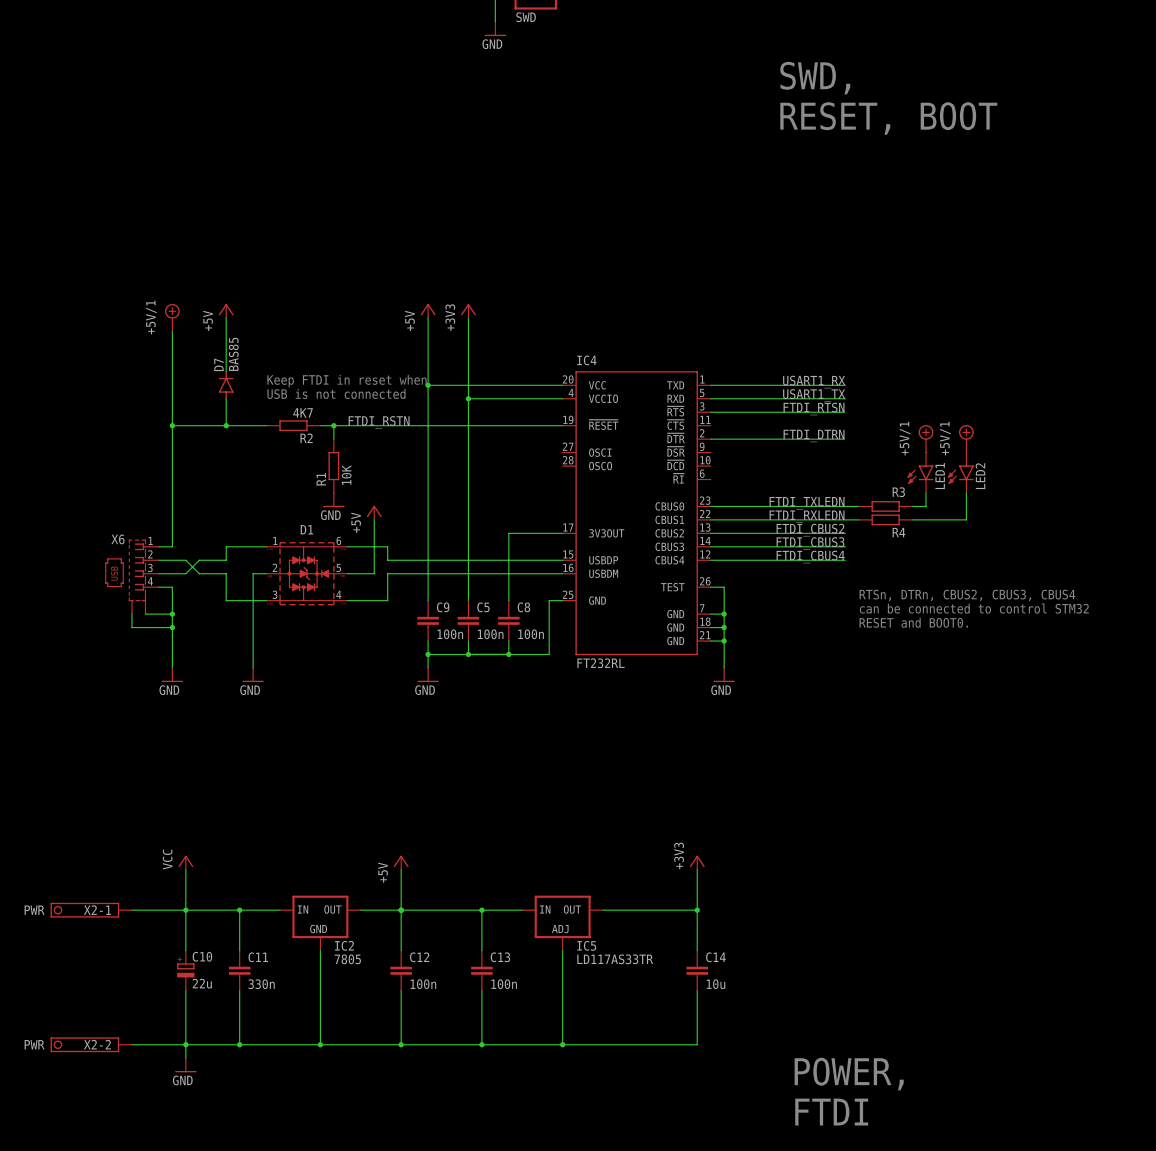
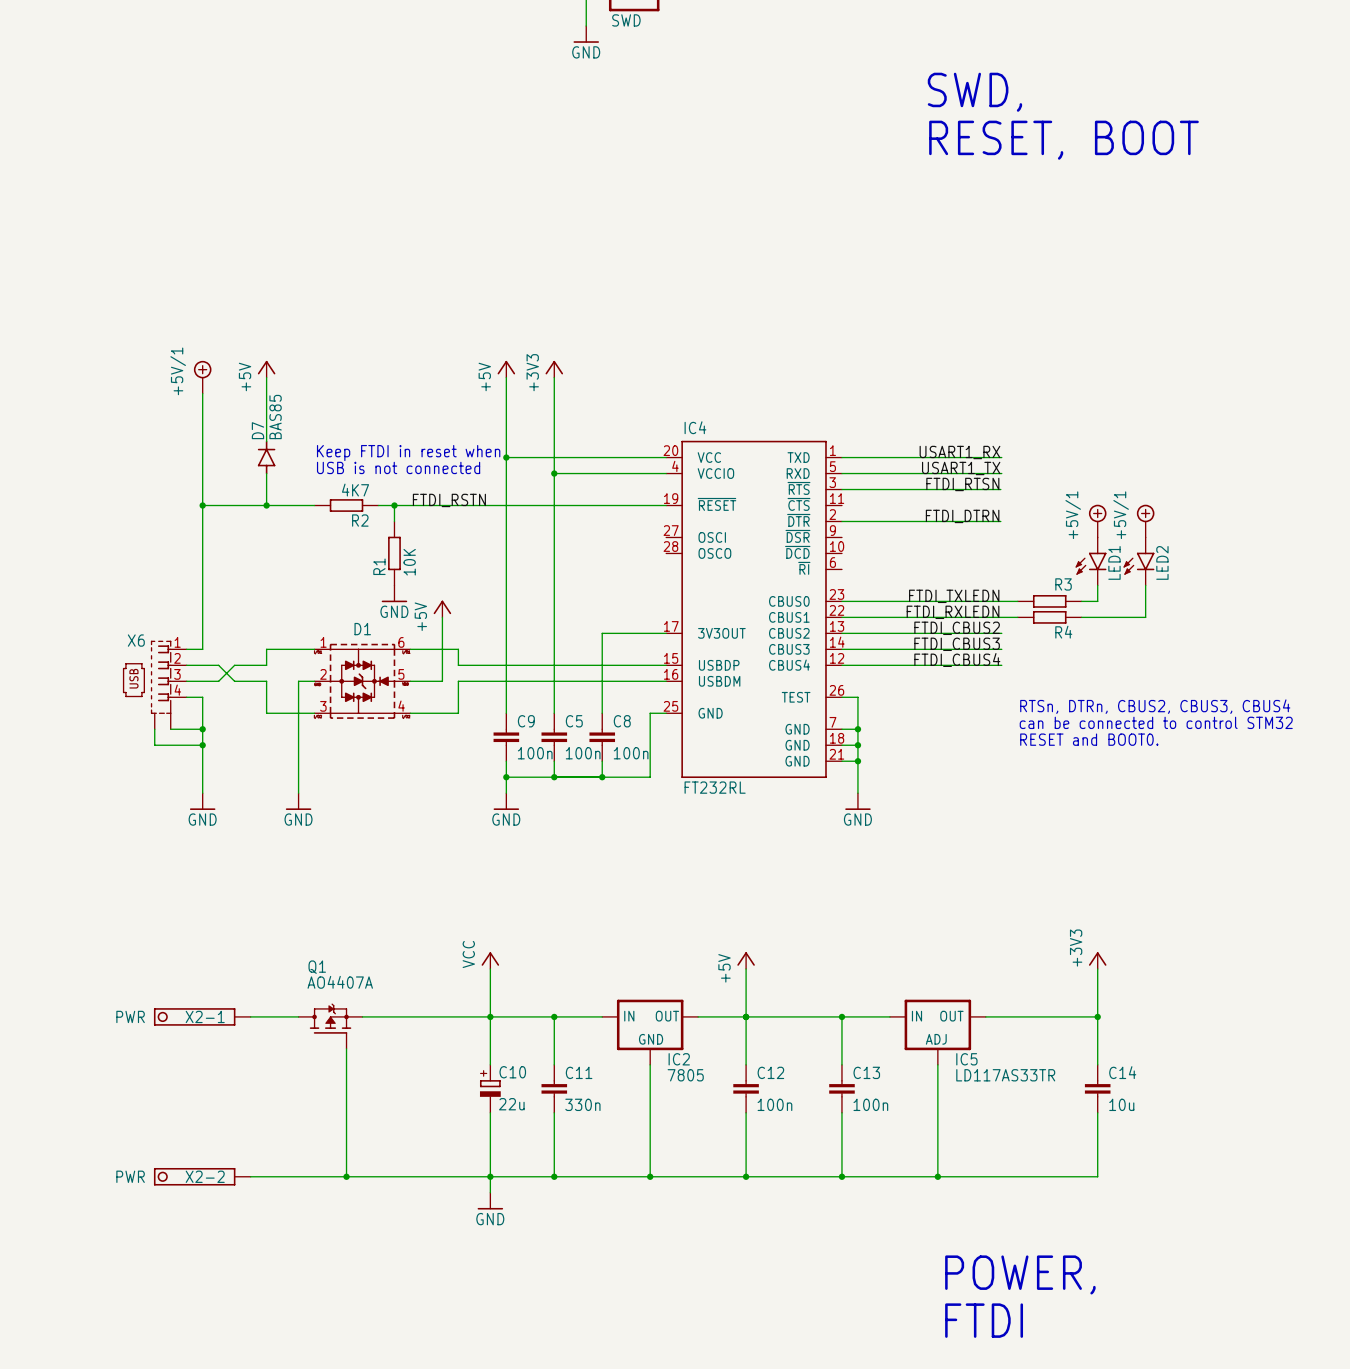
power symbol: none -> VCC (490, 960)
power symbol: none -> +5V (746, 960)
power symbol: none -> +3V3 (1097, 960)
wire: none -> (1097, 969) (1097, 1064)
wire: none -> (250, 1016) (298, 1016)
wire: none -> (362, 1016) (602, 1016)
junction: none -> (490, 1016)
junction: none -> (554, 1016)
wire: none -> (698, 1016) (889, 1016)
junction: none -> (746, 1016)
wire: none -> (841, 1016) (841, 1064)
junction: none -> (841, 1016)
wire: none -> (985, 1016) (1097, 1016)
junction: none -> (1097, 1016)
power symbol: VCC (185, 862) -> none
power symbol: +5V (401, 862) -> none
power symbol: +3V3 (697, 862) -> none
Q1: none -> AO4407A (330, 1026)
wire: (185, 869) (185, 950) -> none
wire: (401, 869) (401, 950) -> (490, 969) (490, 1064)
wire: (697, 869) (697, 950) -> (746, 969) (746, 1064)
wire: none -> (346, 1048) (346, 1176)
wire: none -> (937, 1064) (937, 1176)
X2-1 position: (91, 910) -> (202, 1016)
wire: (132, 910) (280, 910) -> none
junction: (185, 910) -> none
wire: (239, 910) (239, 950) -> none
junction: (239, 910) -> none
wire: (360, 910) (522, 910) -> none
junction: (401, 910) -> none
wire: (481, 910) (481, 950) -> (554, 1016) (554, 1064)
junction: (481, 910) -> none
wire: (603, 910) (697, 910) -> none
junction: (697, 910) -> none
IC2 position: (320, 923) -> (650, 1032)
IC5 position: (562, 923) -> (937, 1032)
wire: none -> (490, 1112) (490, 1192)
wire: none -> (746, 1112) (746, 1176)
wire: none -> (841, 1112) (841, 1176)
wire: none -> (1097, 1112) (1097, 1176) (250, 1176)
wire: (320, 950) (320, 1044) -> none
wire: (562, 950) (562, 1044) -> (650, 1064) (650, 1176)
C10 position: (185, 970) -> (490, 1088)
C11 position: (239, 970) -> (554, 1088)
C12 position: (401, 970) -> (746, 1088)
C13 position: (481, 970) -> (841, 1088)
C14 position: (697, 970) -> (1097, 1088)
wire: (185, 990) (185, 1058) -> none
wire: (239, 990) (239, 1044) -> none
junction: none -> (346, 1176)
wire: (401, 990) (401, 1044) -> none
junction: none -> (490, 1176)
junction: none -> (554, 1176)
wire: (481, 990) (481, 1044) -> (554, 1112) (554, 1176)
junction: none -> (650, 1176)
junction: none -> (746, 1176)
wire: (697, 990) (697, 1044) (132, 1044) -> none
junction: none -> (841, 1176)
junction: none -> (937, 1176)
power symbol: none -> GND (490, 1201)
X2-2 position: (91, 1044) -> (202, 1176)
junction: (185, 1044) -> none
junction: (239, 1044) -> none
junction: (320, 1044) -> none
junction: (401, 1044) -> none
junction: (481, 1044) -> none
junction: (562, 1044) -> none
power symbol: GND (185, 1065) -> none

